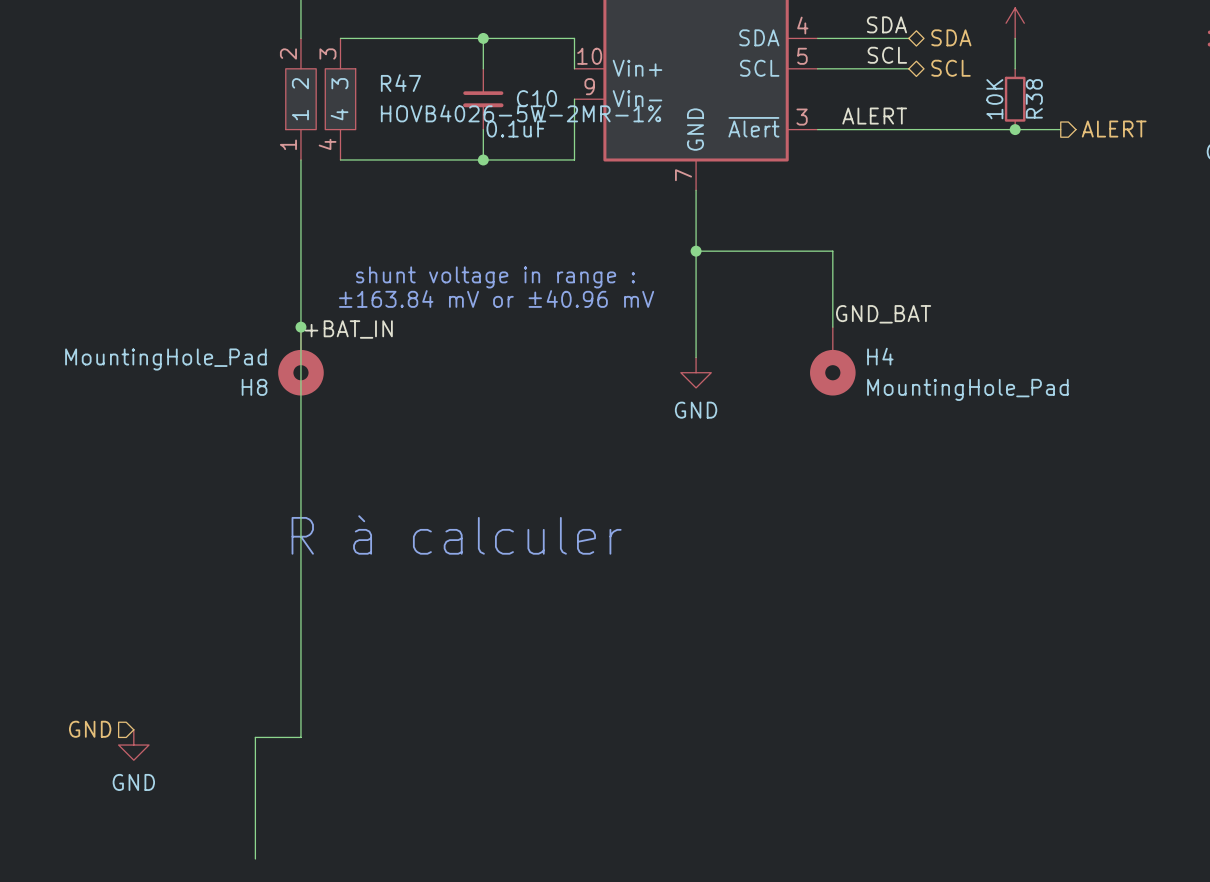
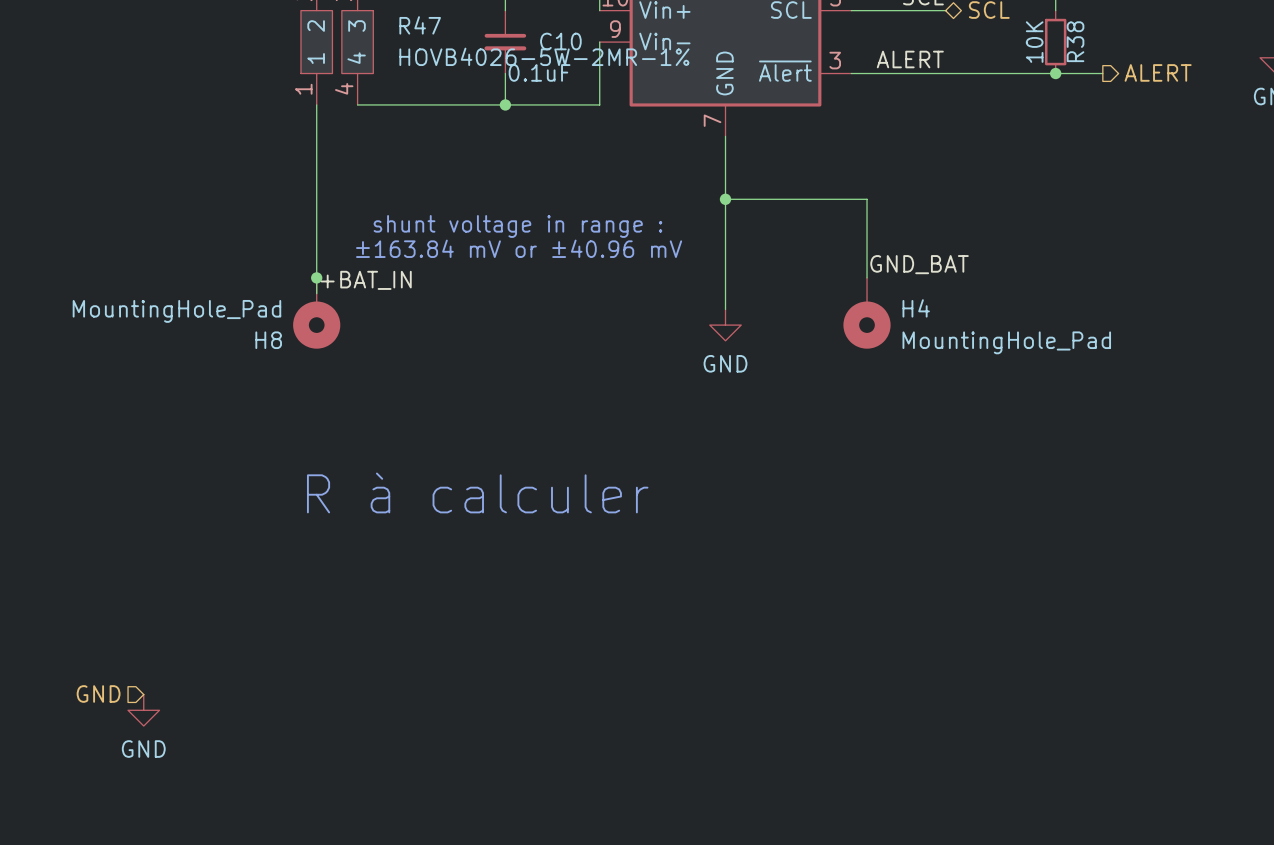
wire: (300, 342) (300, 737) (255, 737) (255, 858) -> none

